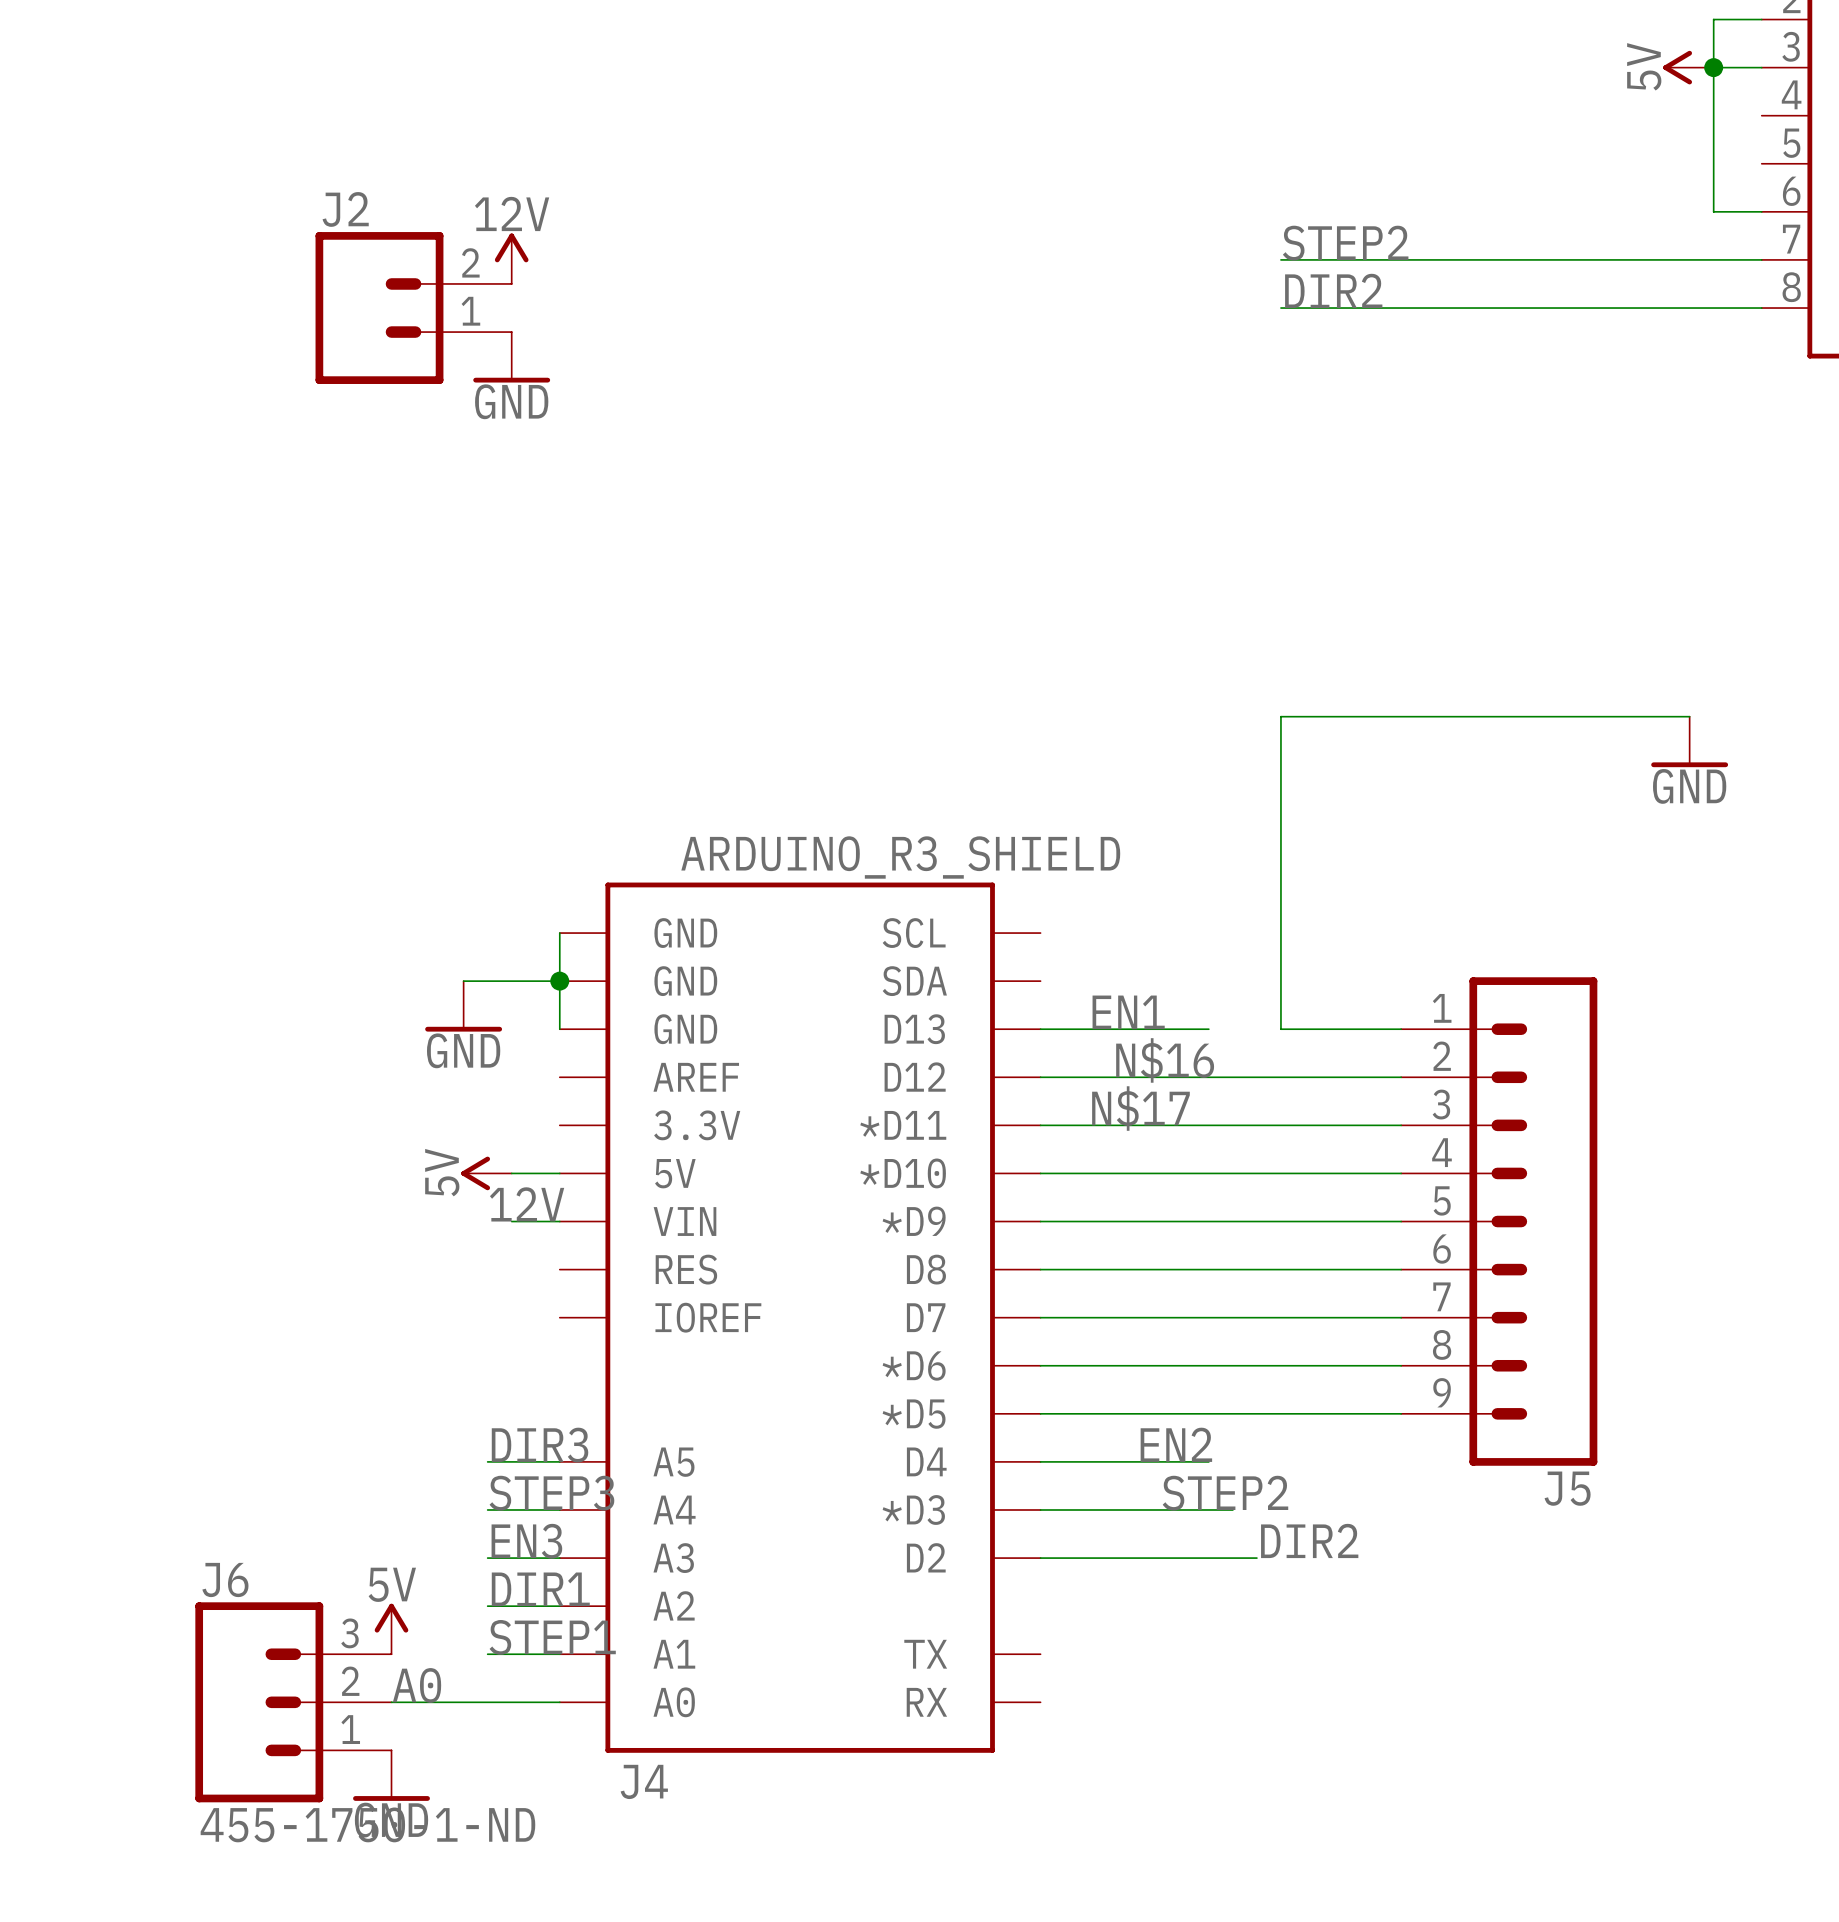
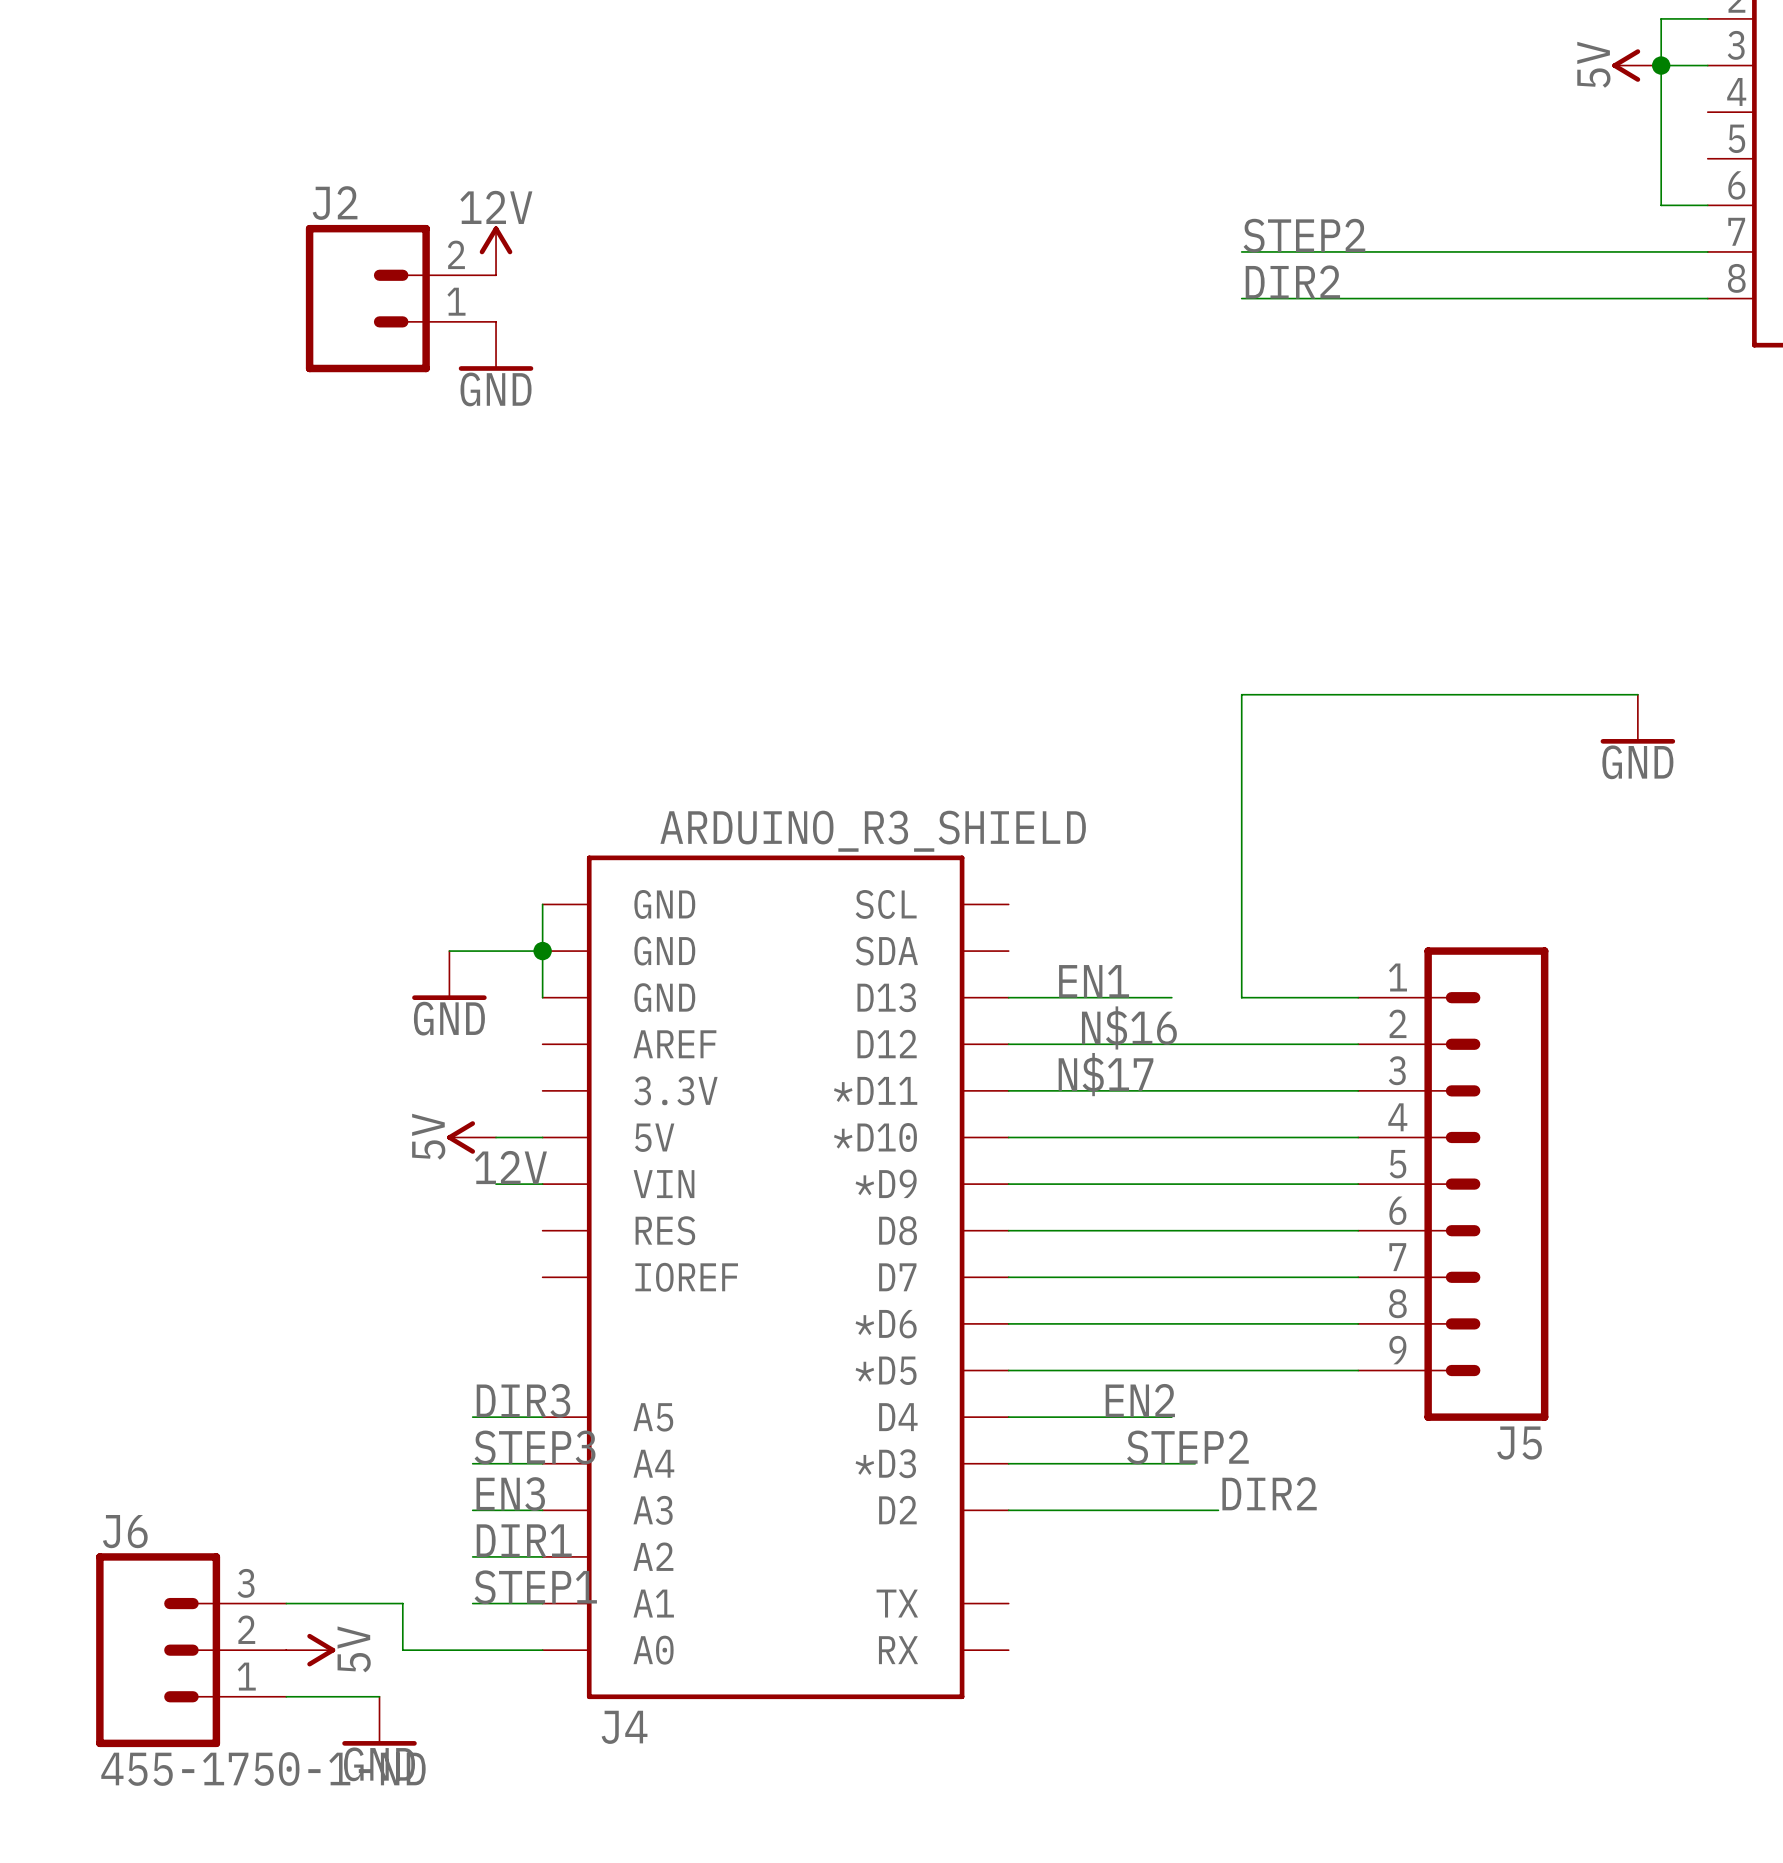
power symbol rotation: 0° (391, 1618) -> 90° clockwise (321, 1650)
power symbol position: 5V (391, 1628) -> 5V (310, 1650)
label: A0 (417, 1685) -> none
J6 position: (293, 1702) -> (191, 1650)
wire: (391, 1702) (415, 1702) -> (286, 1603) (402, 1603) (402, 1650)

